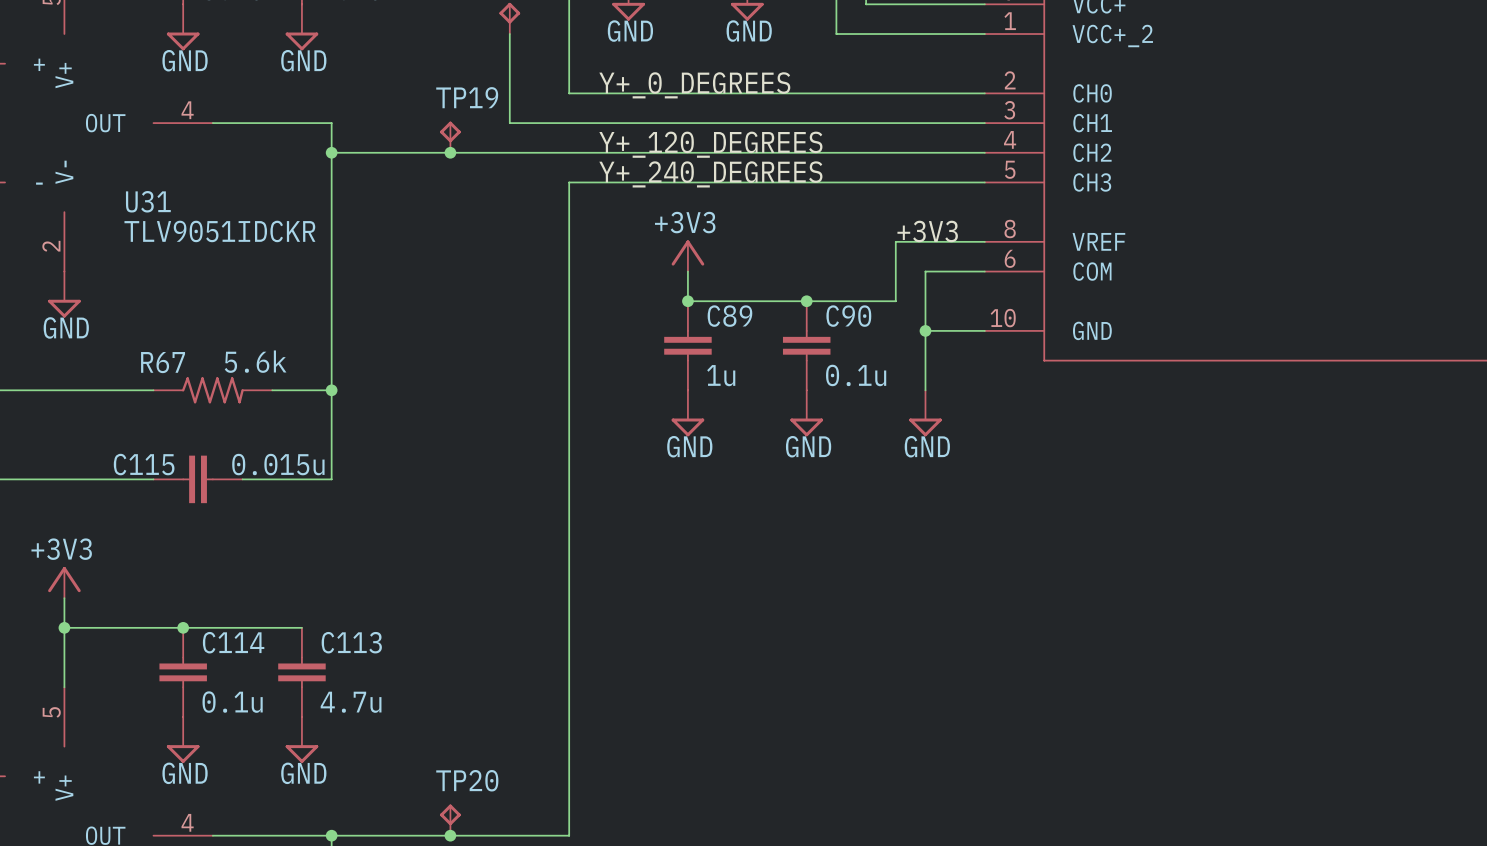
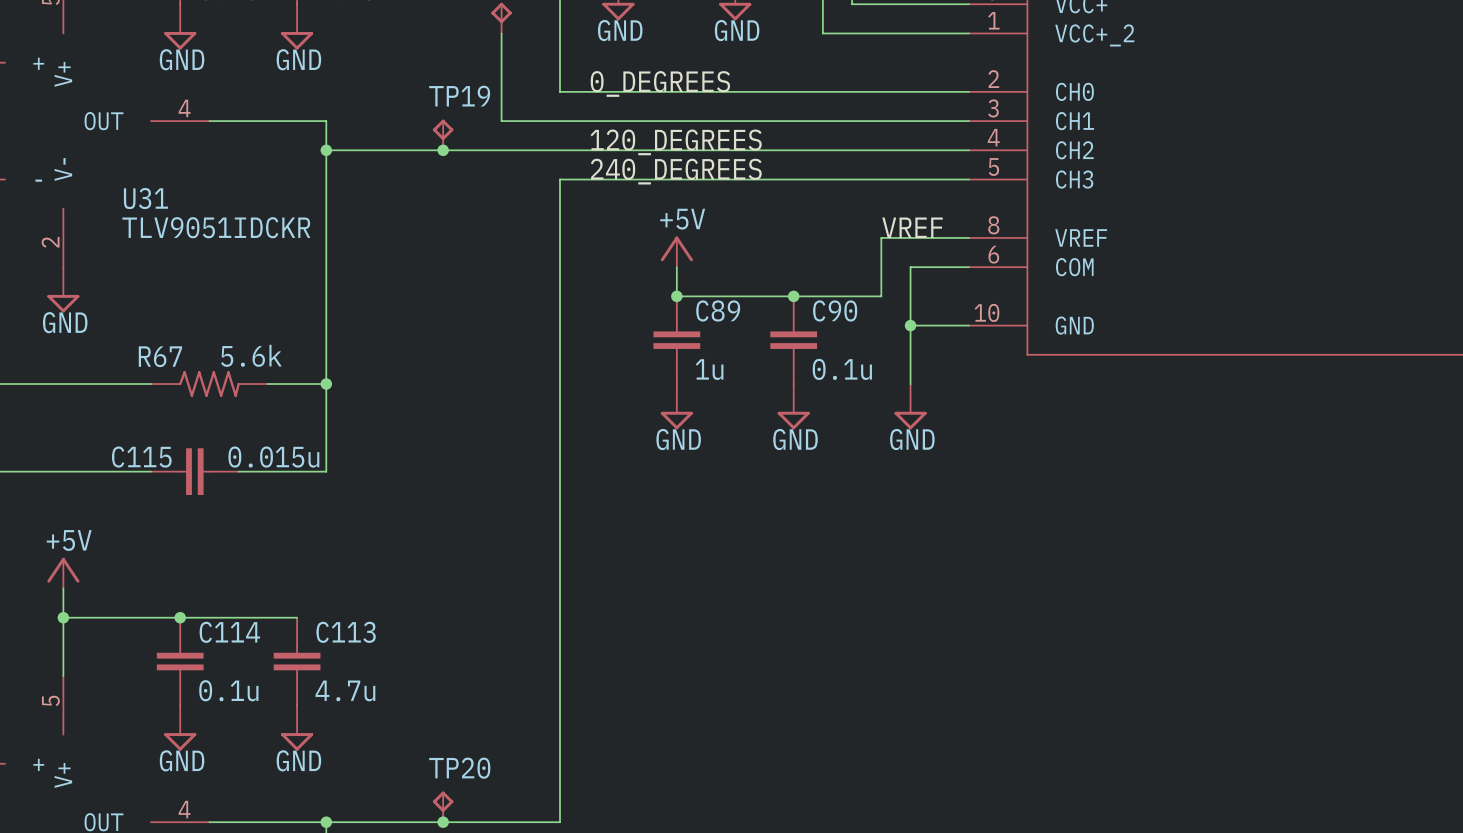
label: Y+_0_DEGREES (694, 85) -> 0_DEGREES (660, 83)
label: Y+_120_DEGREES (710, 144) -> 120_DEGREES (676, 142)
label: Y+_240_DEGREES (710, 174) -> 240_DEGREES (676, 171)
label: +3V3 (927, 231) -> VREF (912, 227)
power symbol: +3V3 (687, 255) -> +5V (676, 251)
power symbol: +3V3 (64, 582) -> +5V (63, 573)

